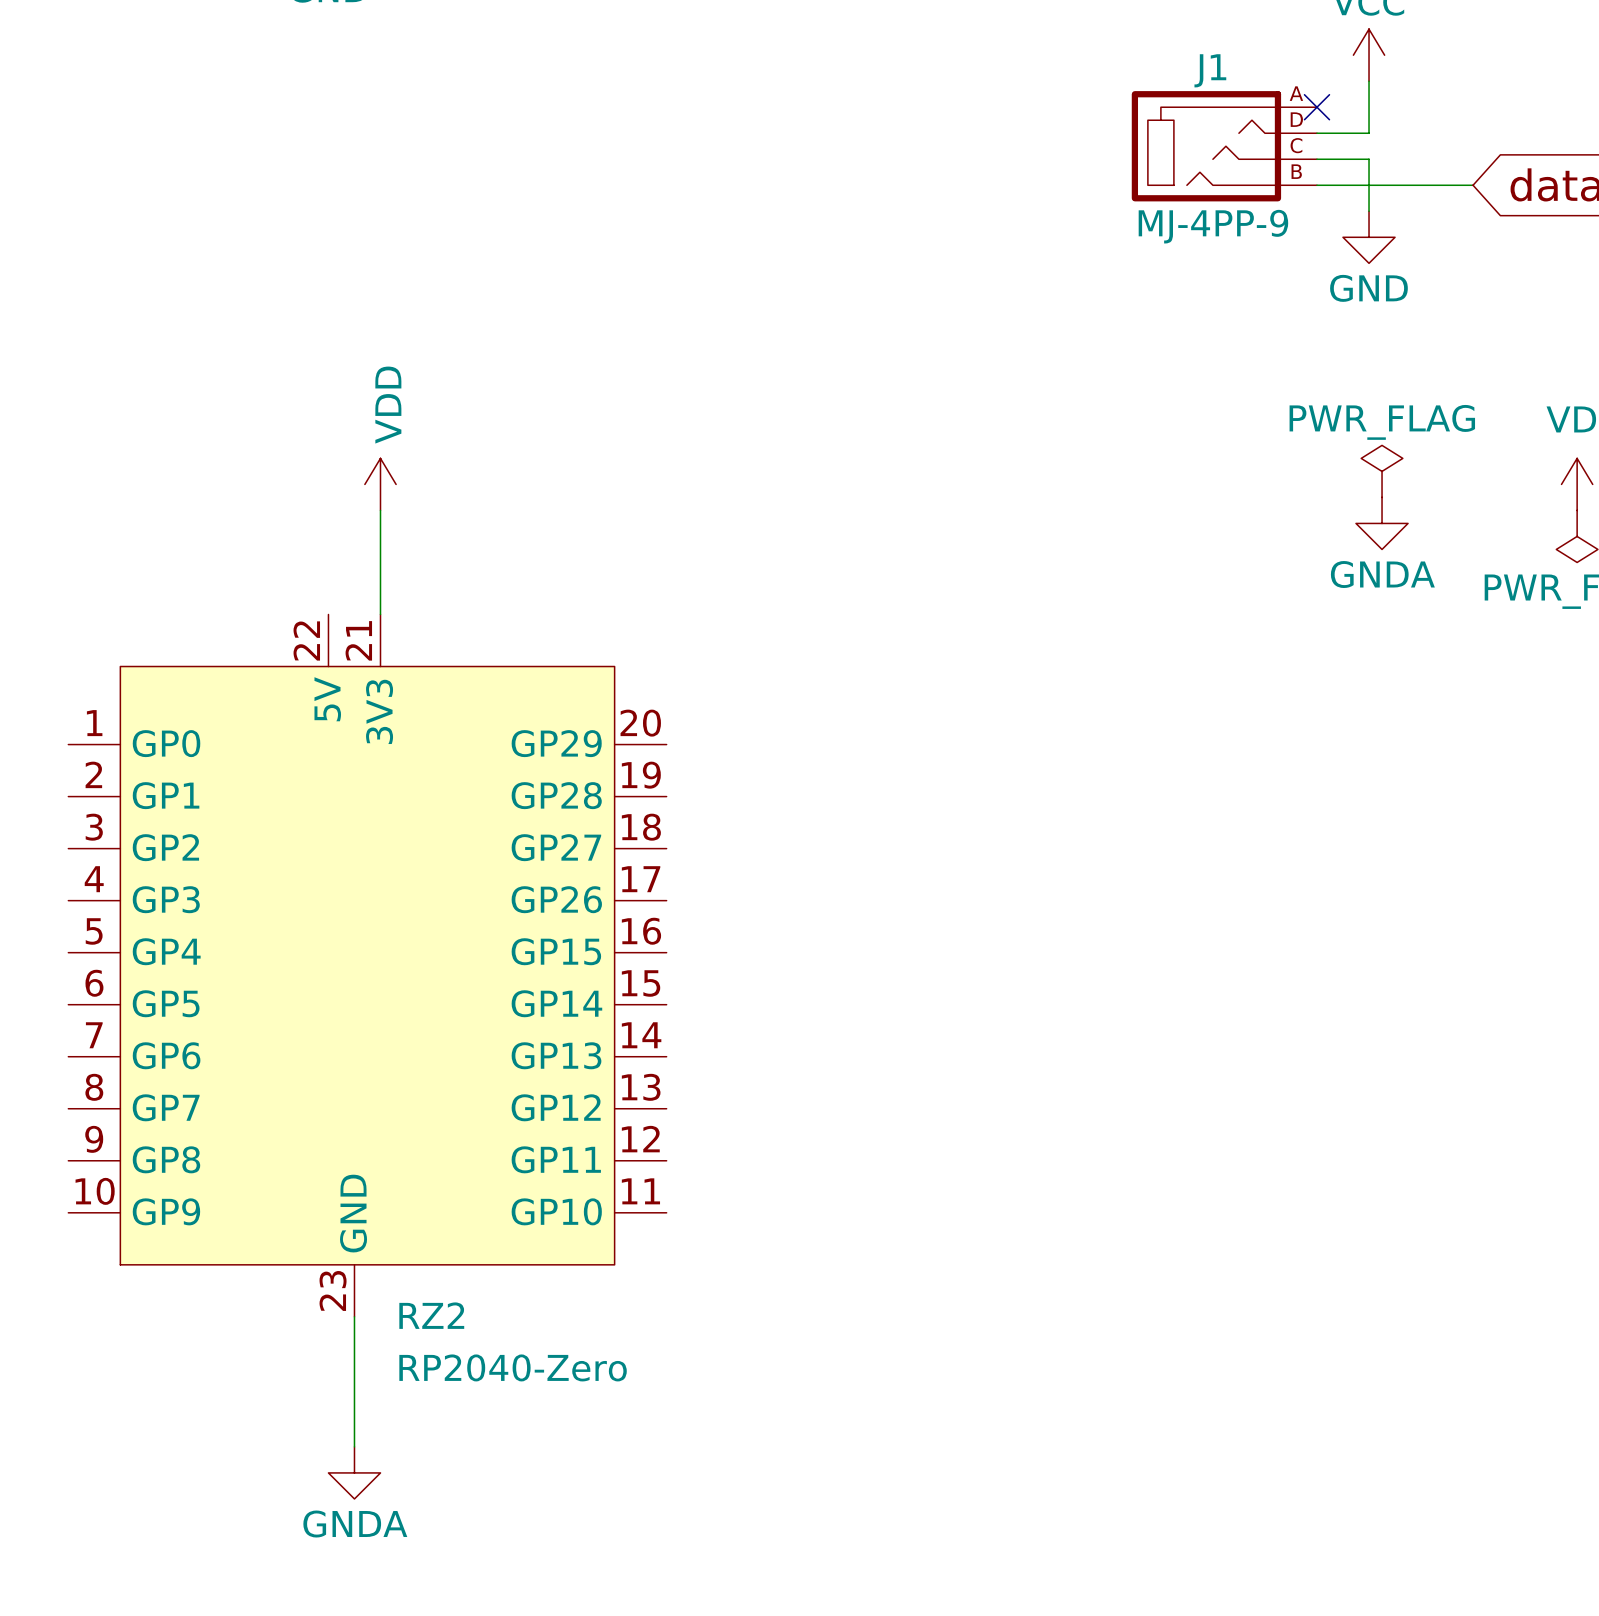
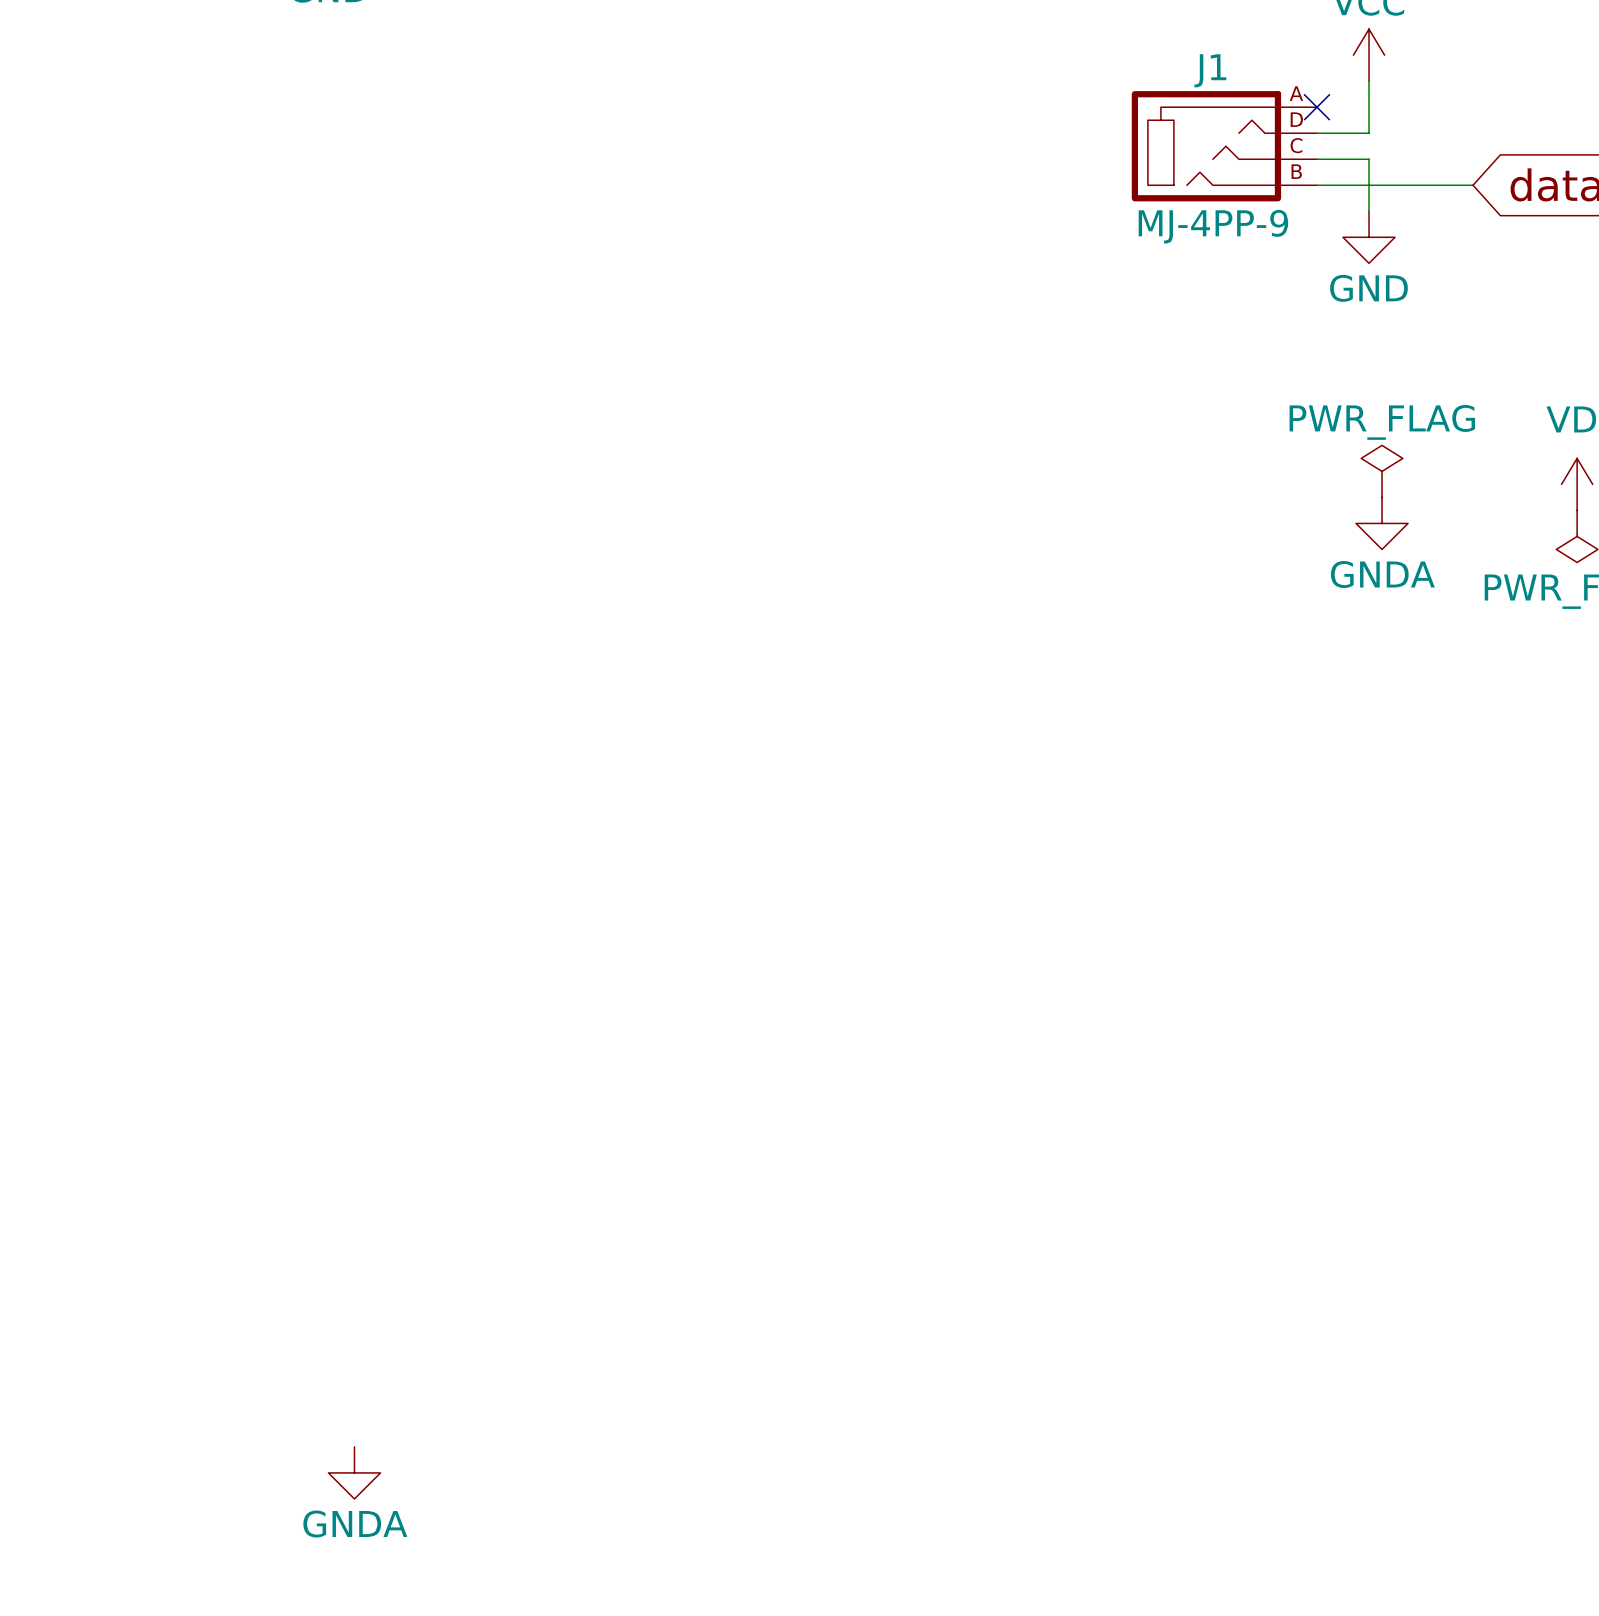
power symbol: VDD (380, 484) -> none
wire: (380, 510) (380, 614) -> none
RZ2: RP2040-Zero (367, 965) -> none
wire: (354, 1316) (354, 1446) -> none

